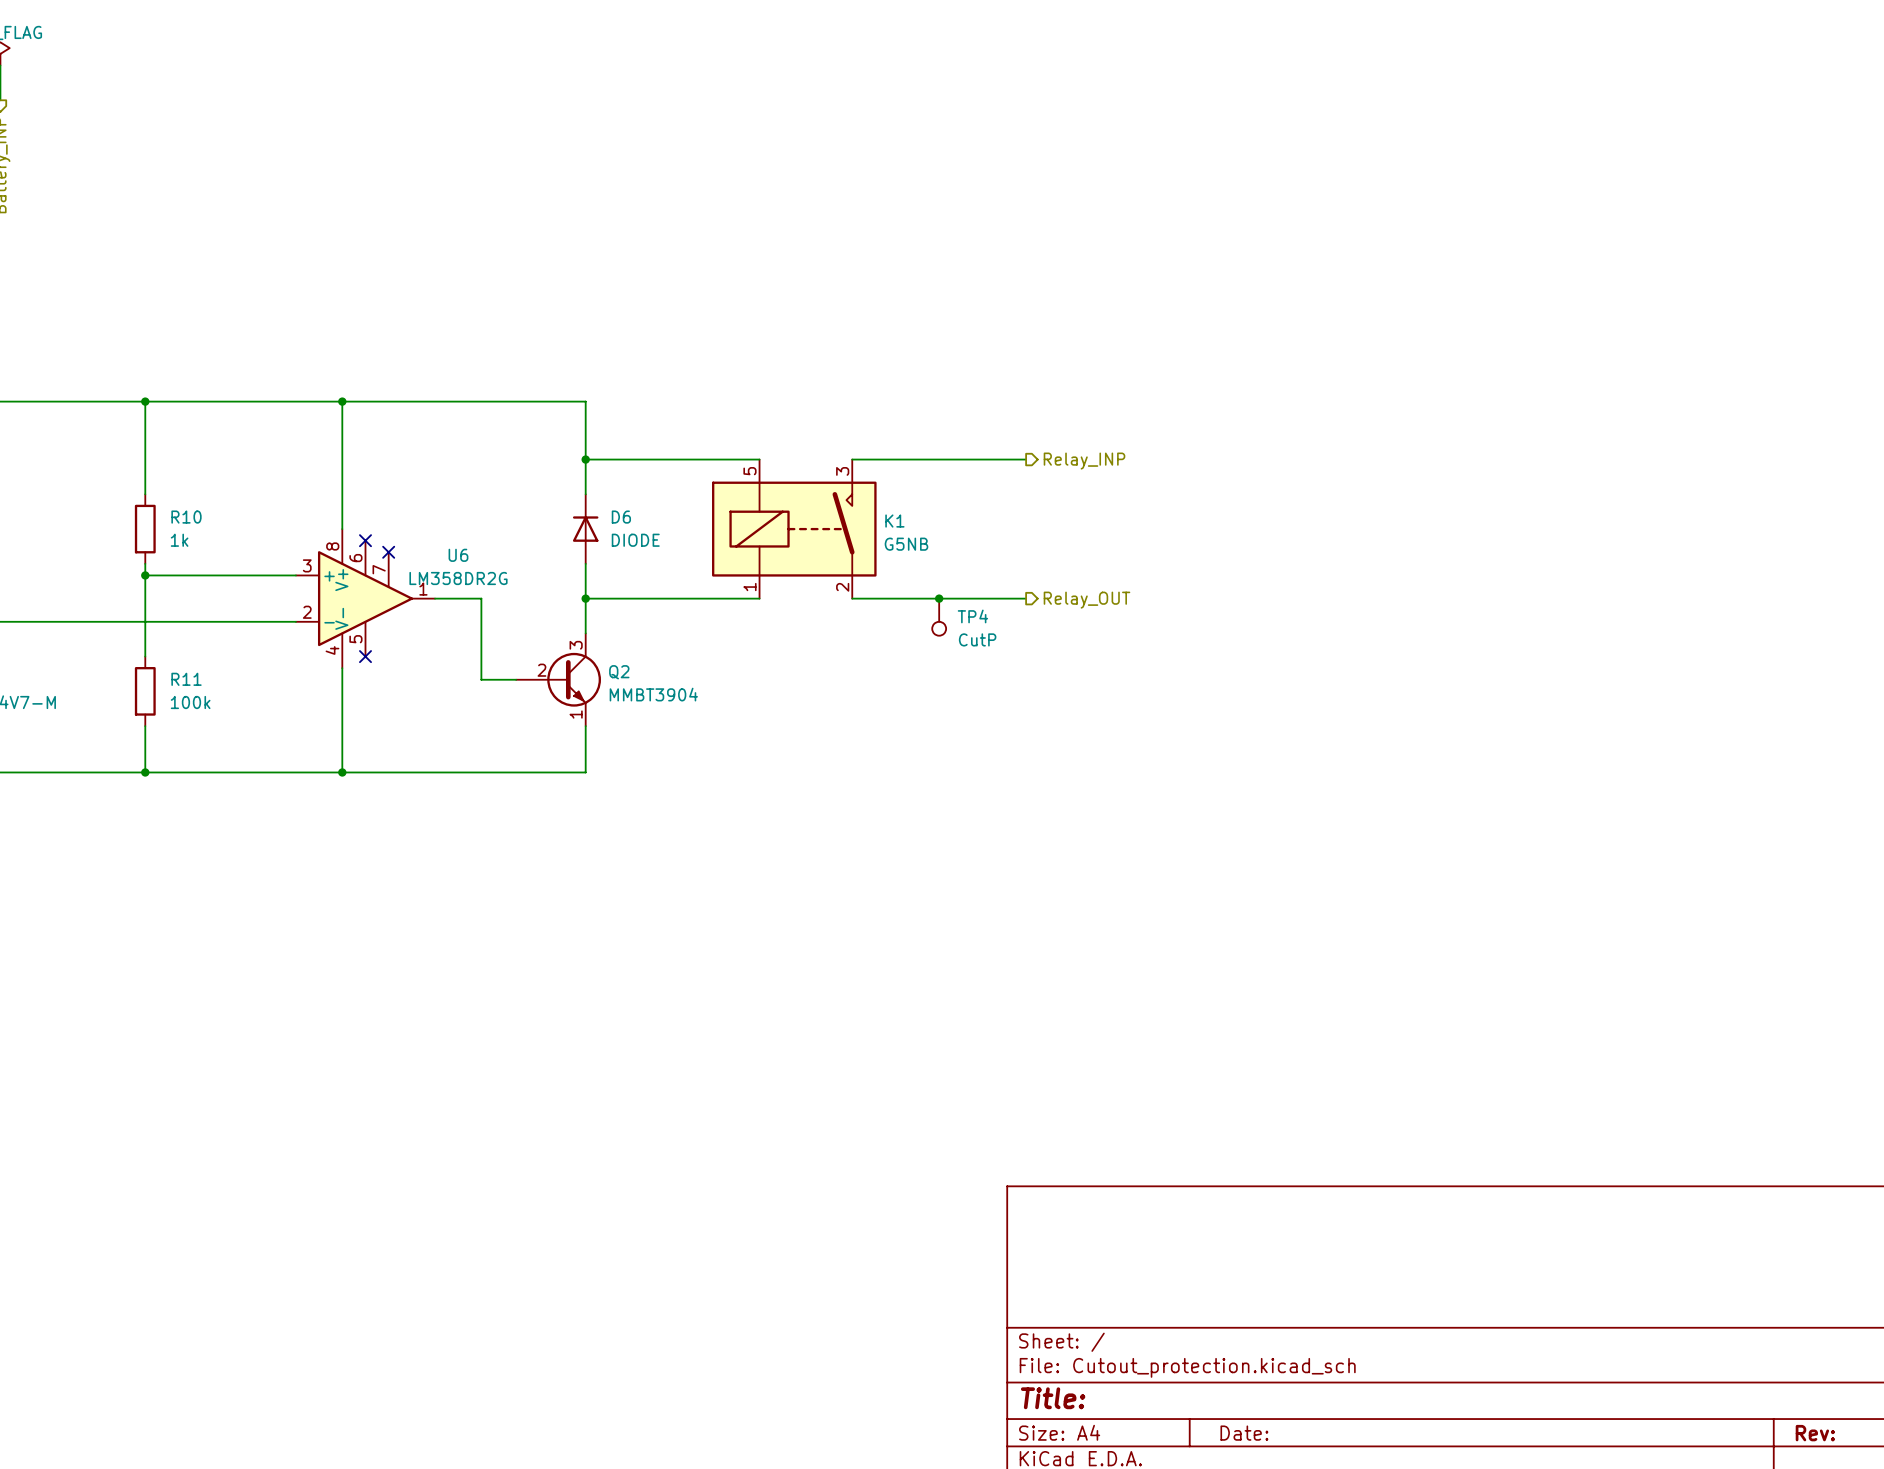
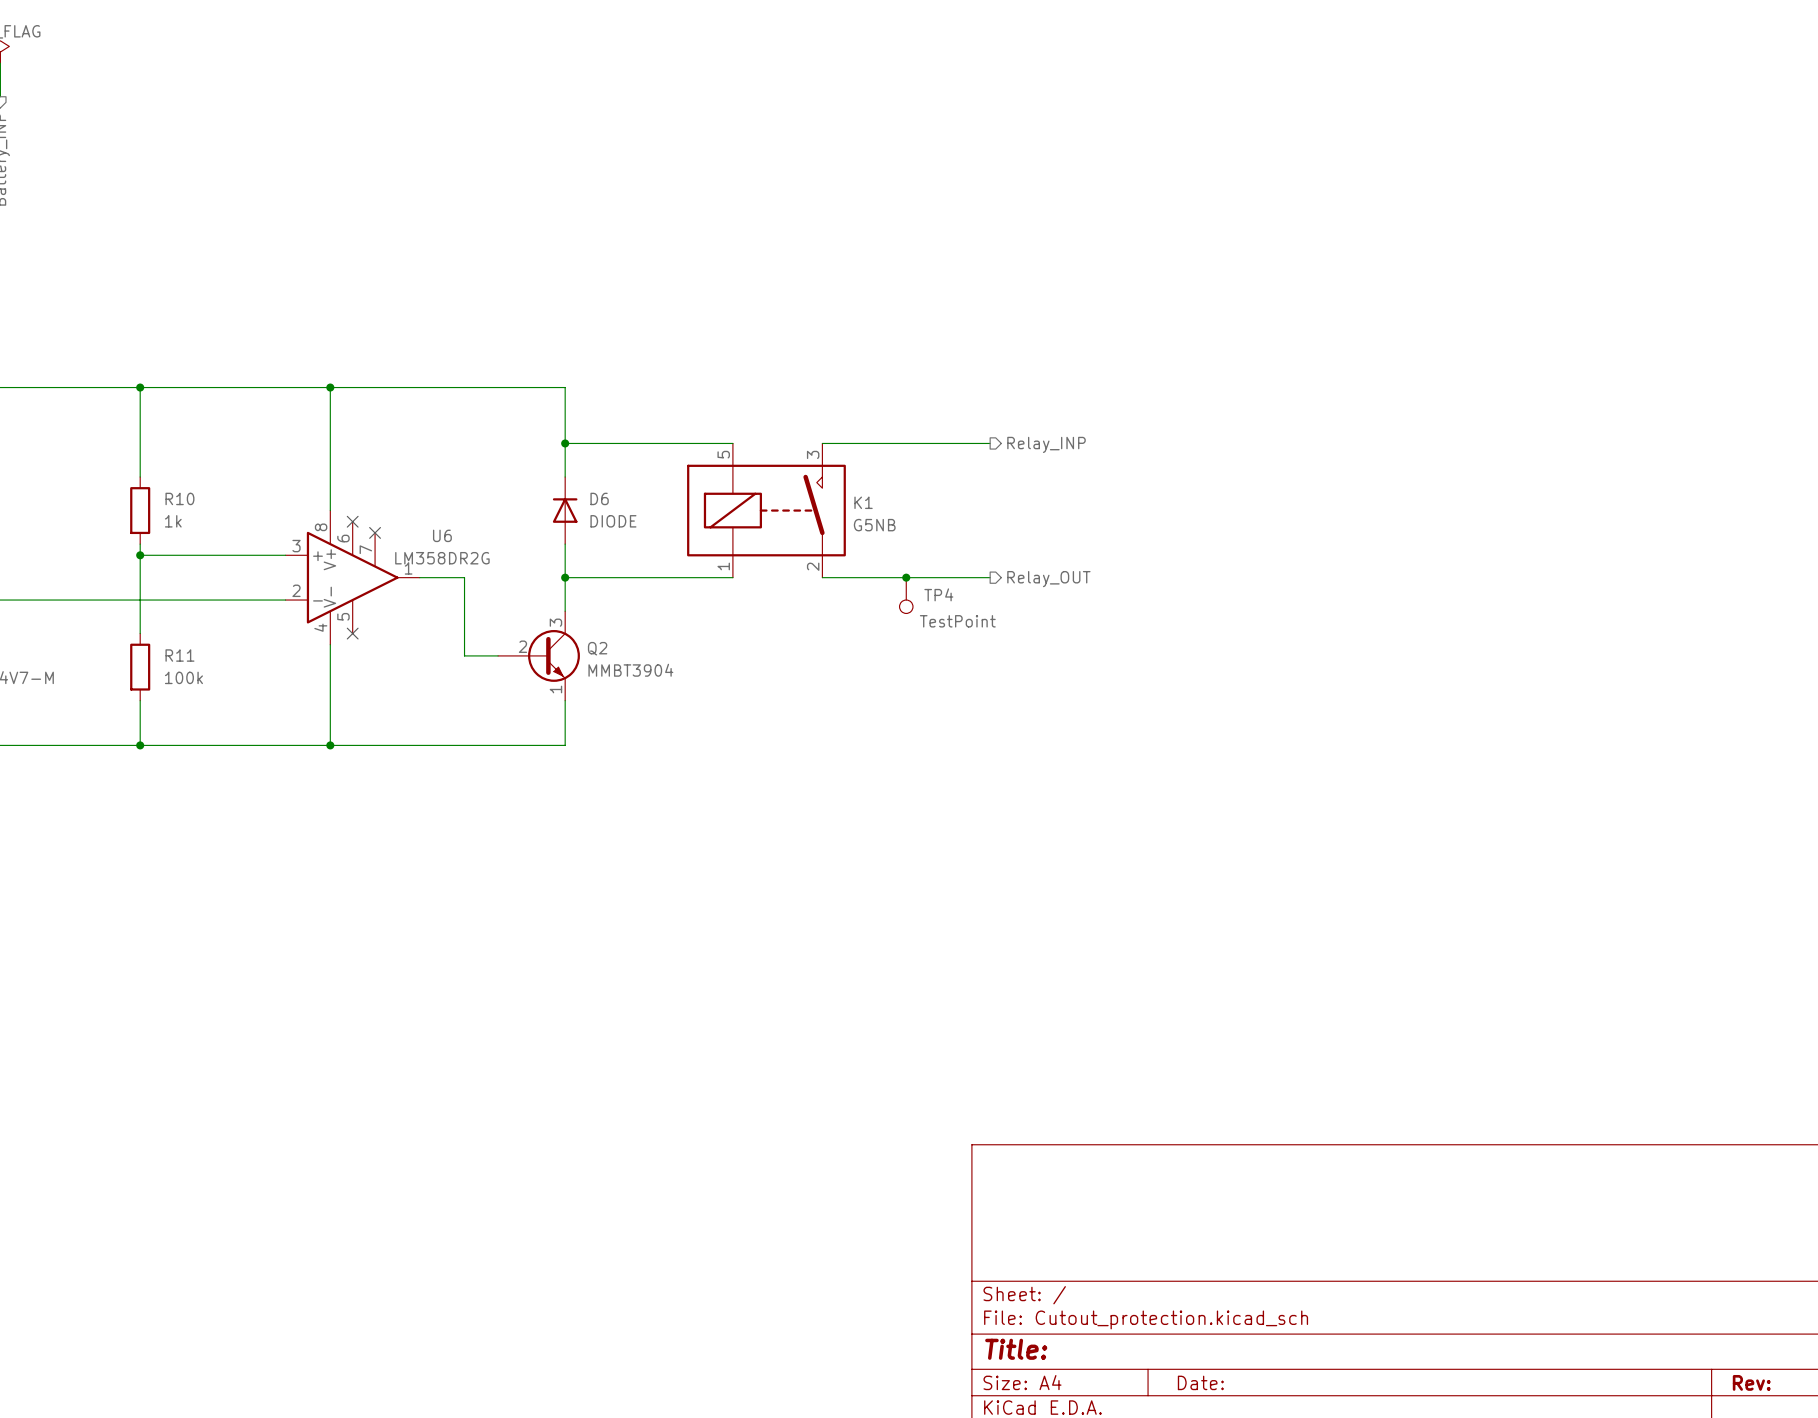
TP4 value: CutP (977, 639) -> TestPoint (957, 621)

